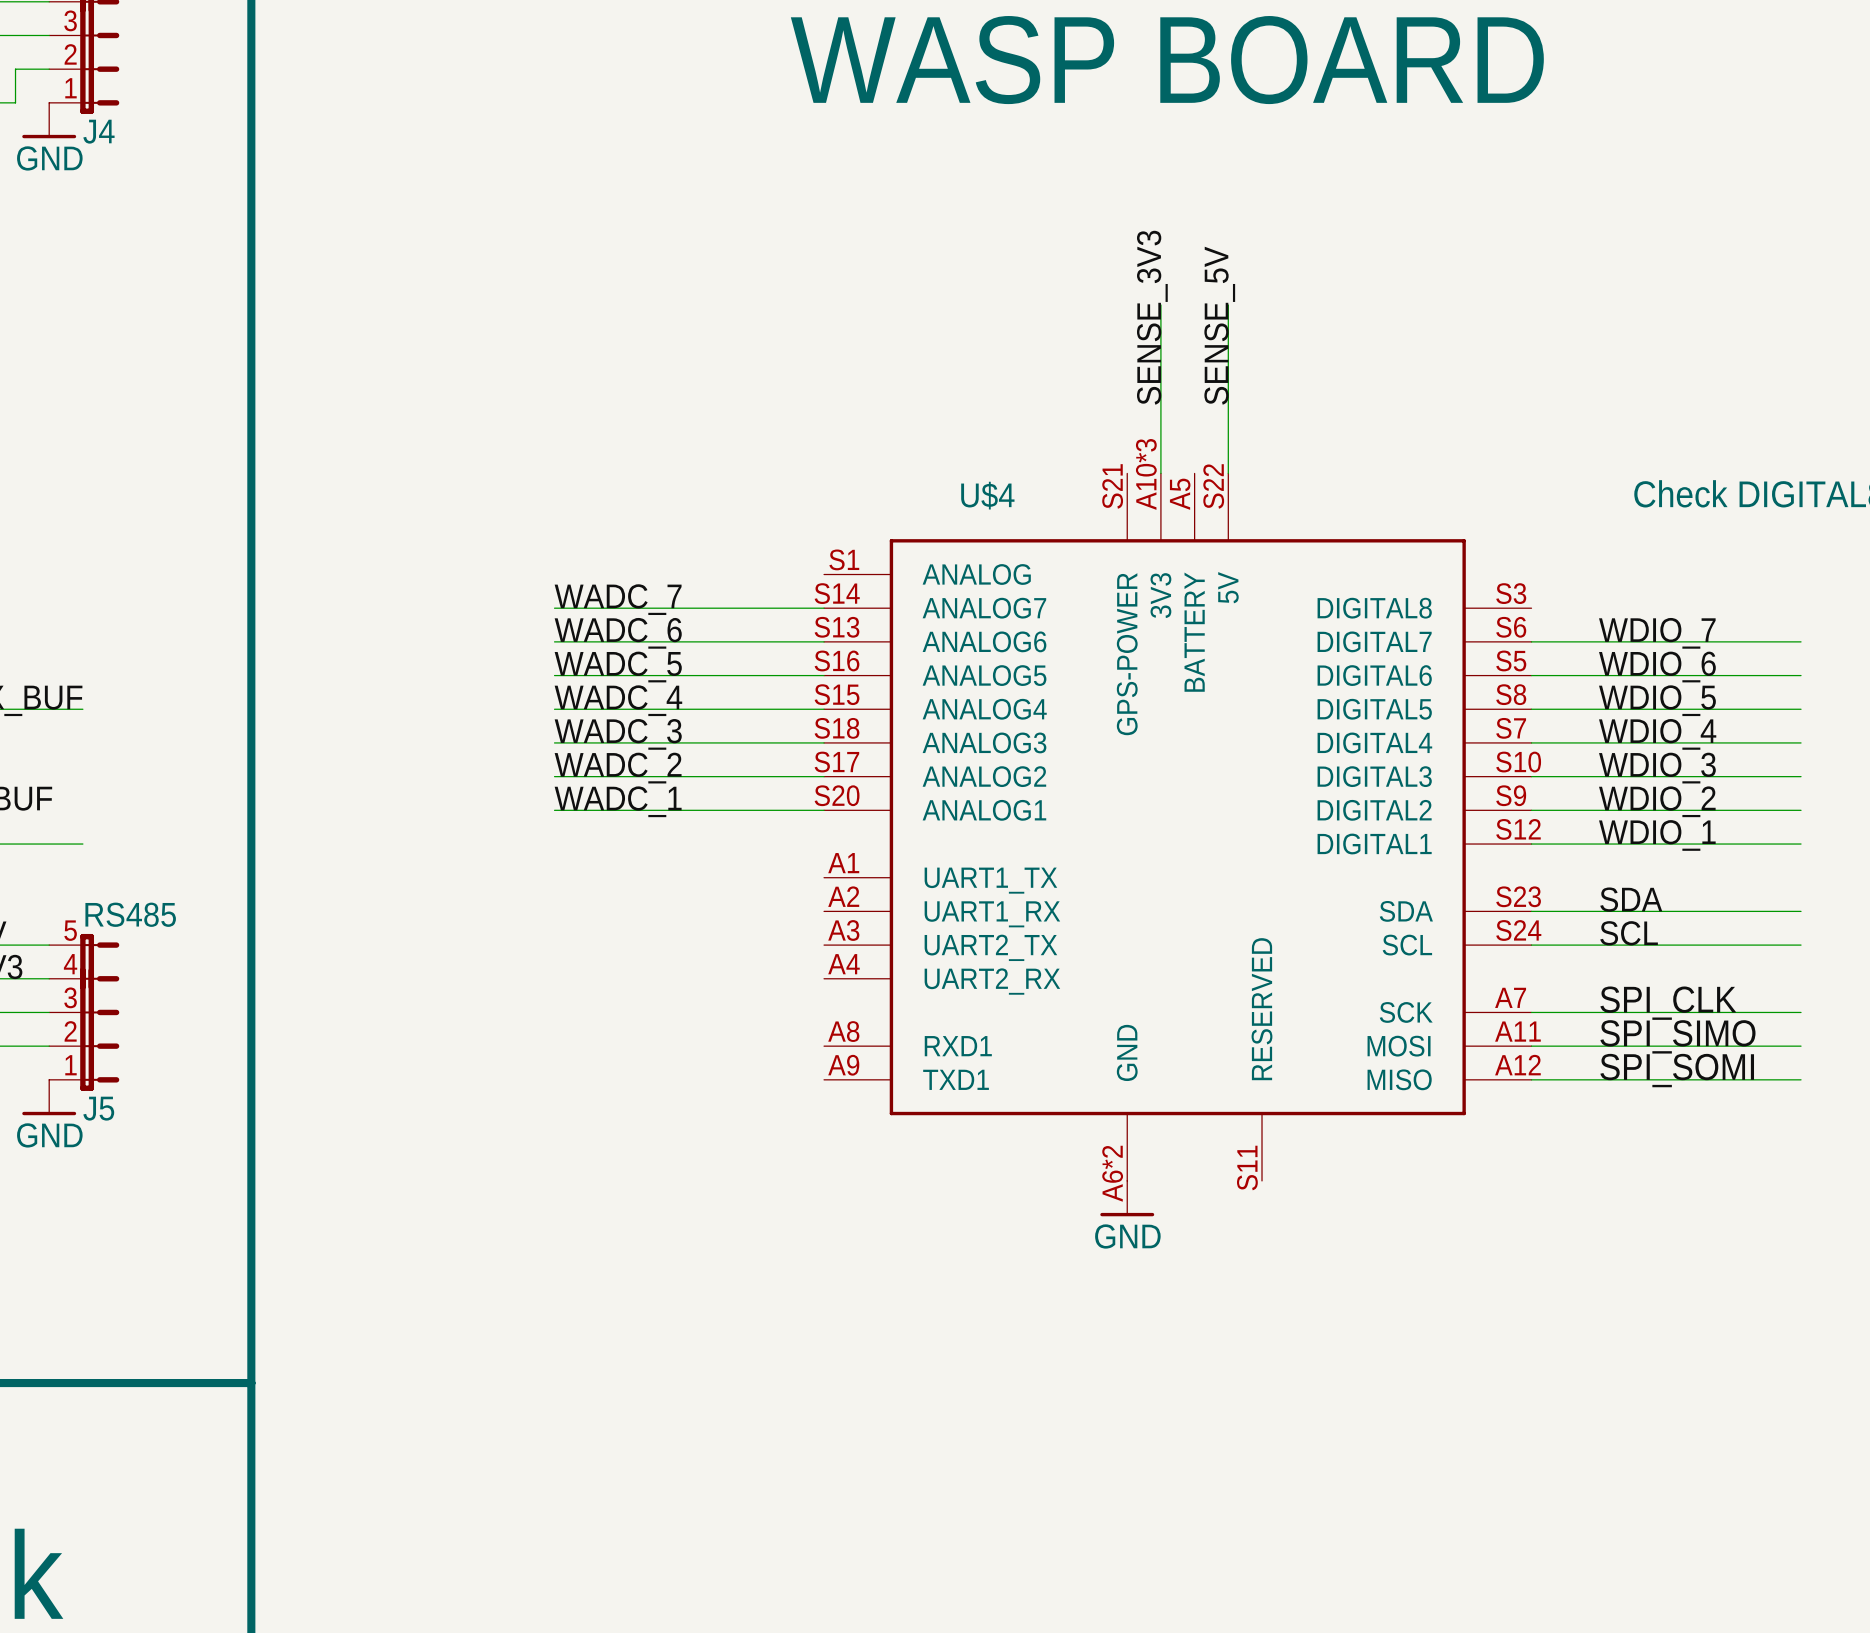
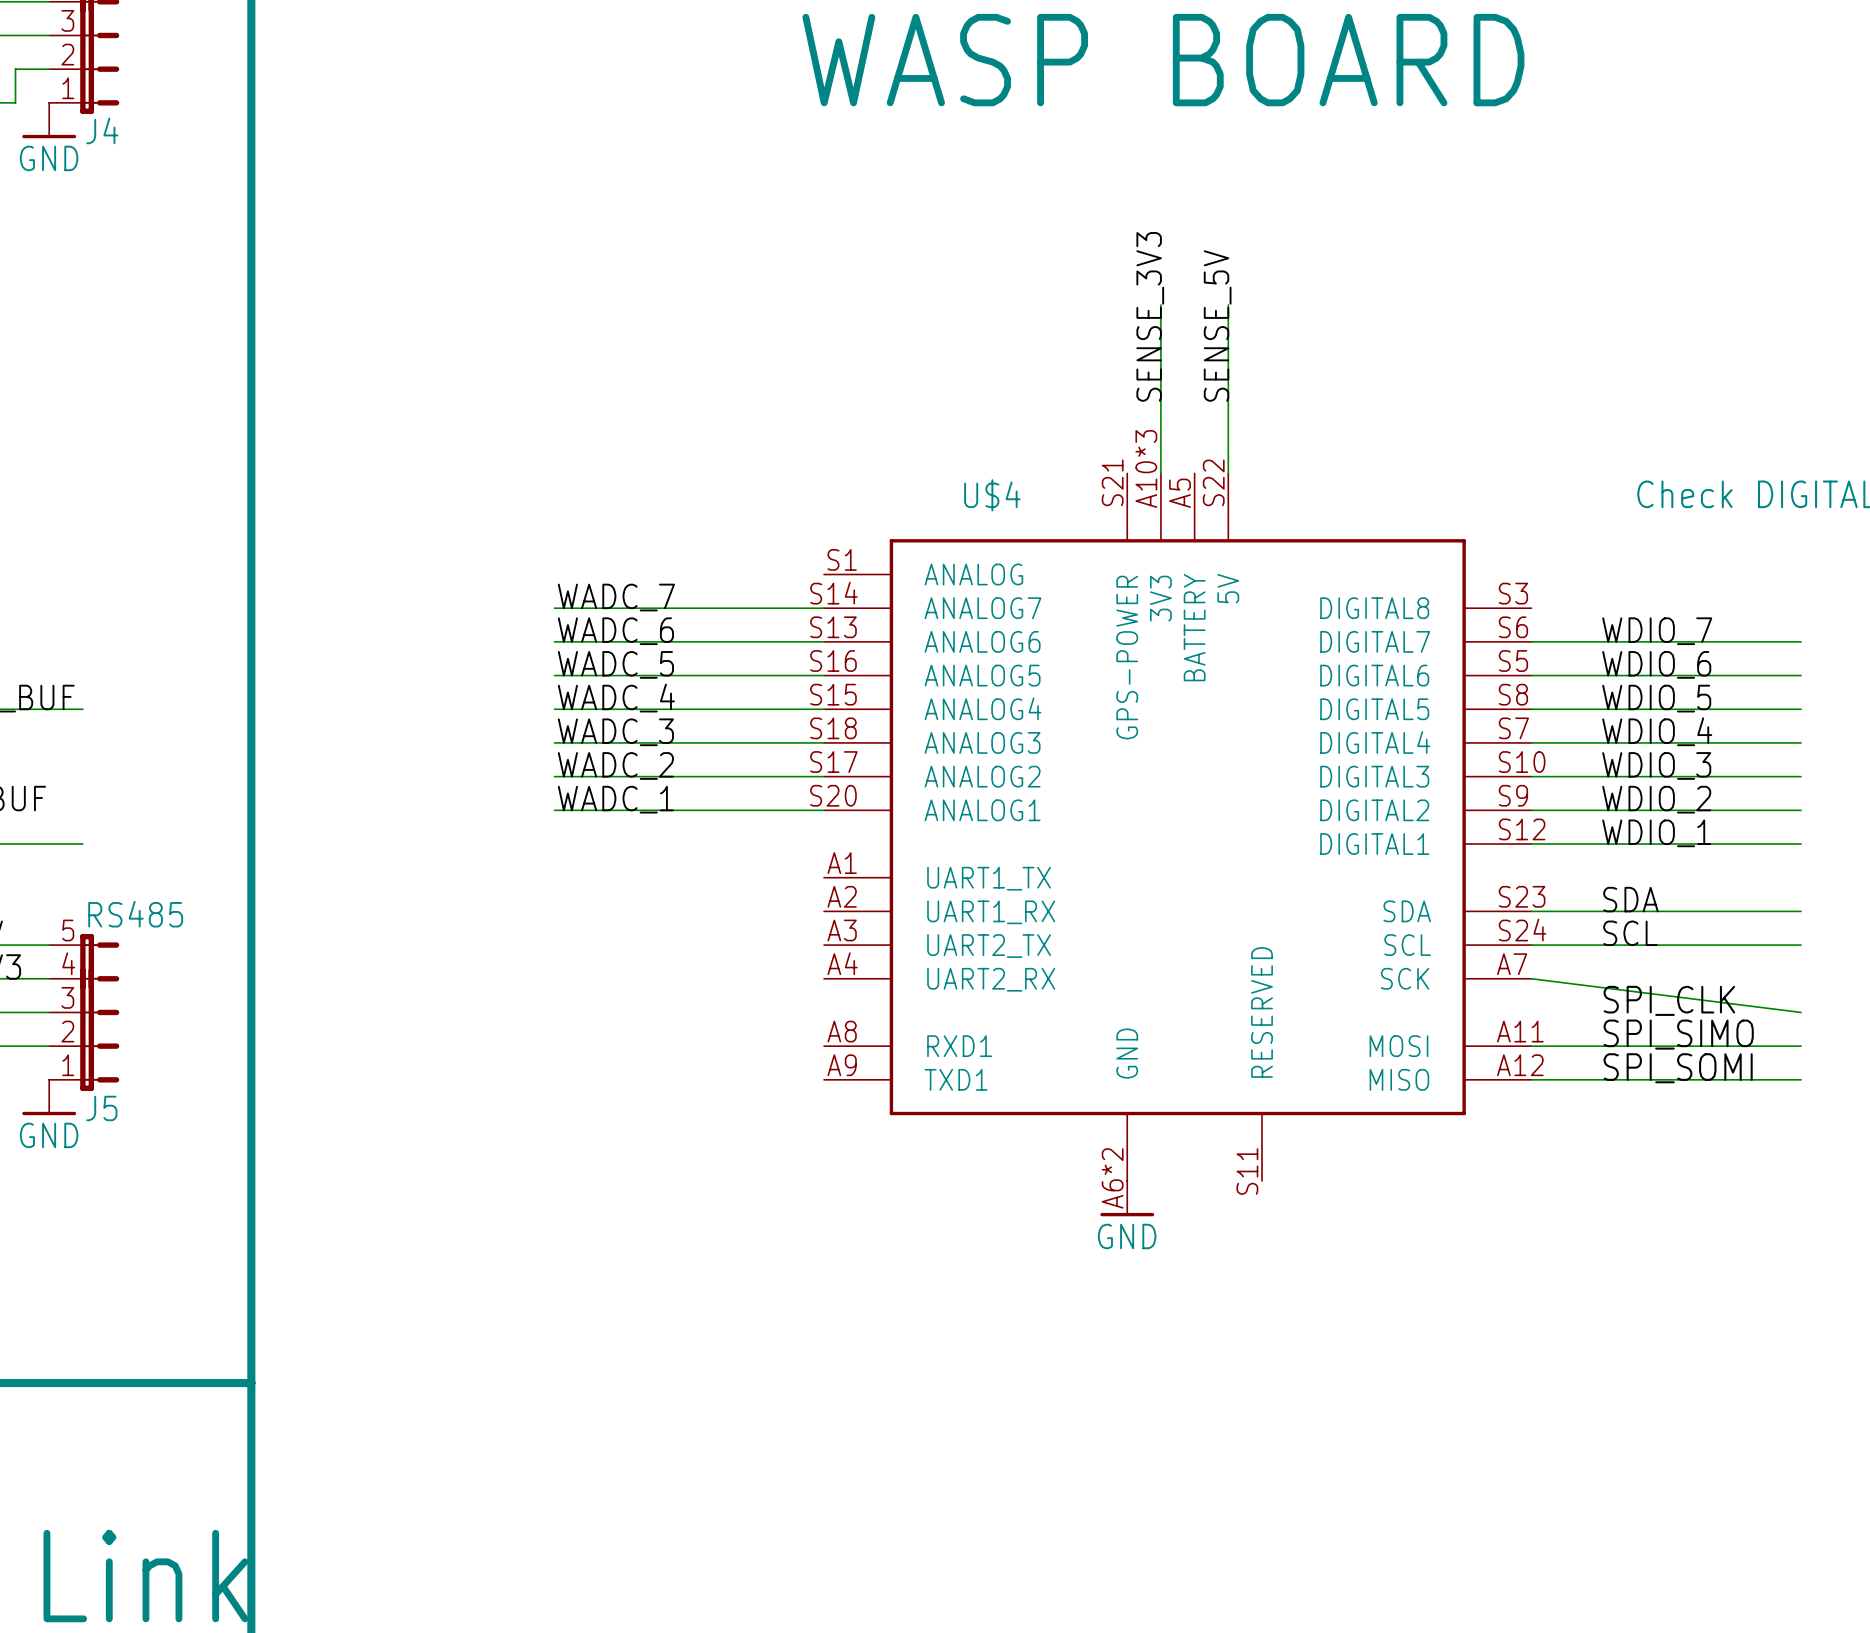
U$4 symbol: [824, 473, 1532, 1181] -> [824, 473, 1532, 1181]
wire: (1531, 1012) (1801, 1012) -> (1531, 978) (1801, 1012)

